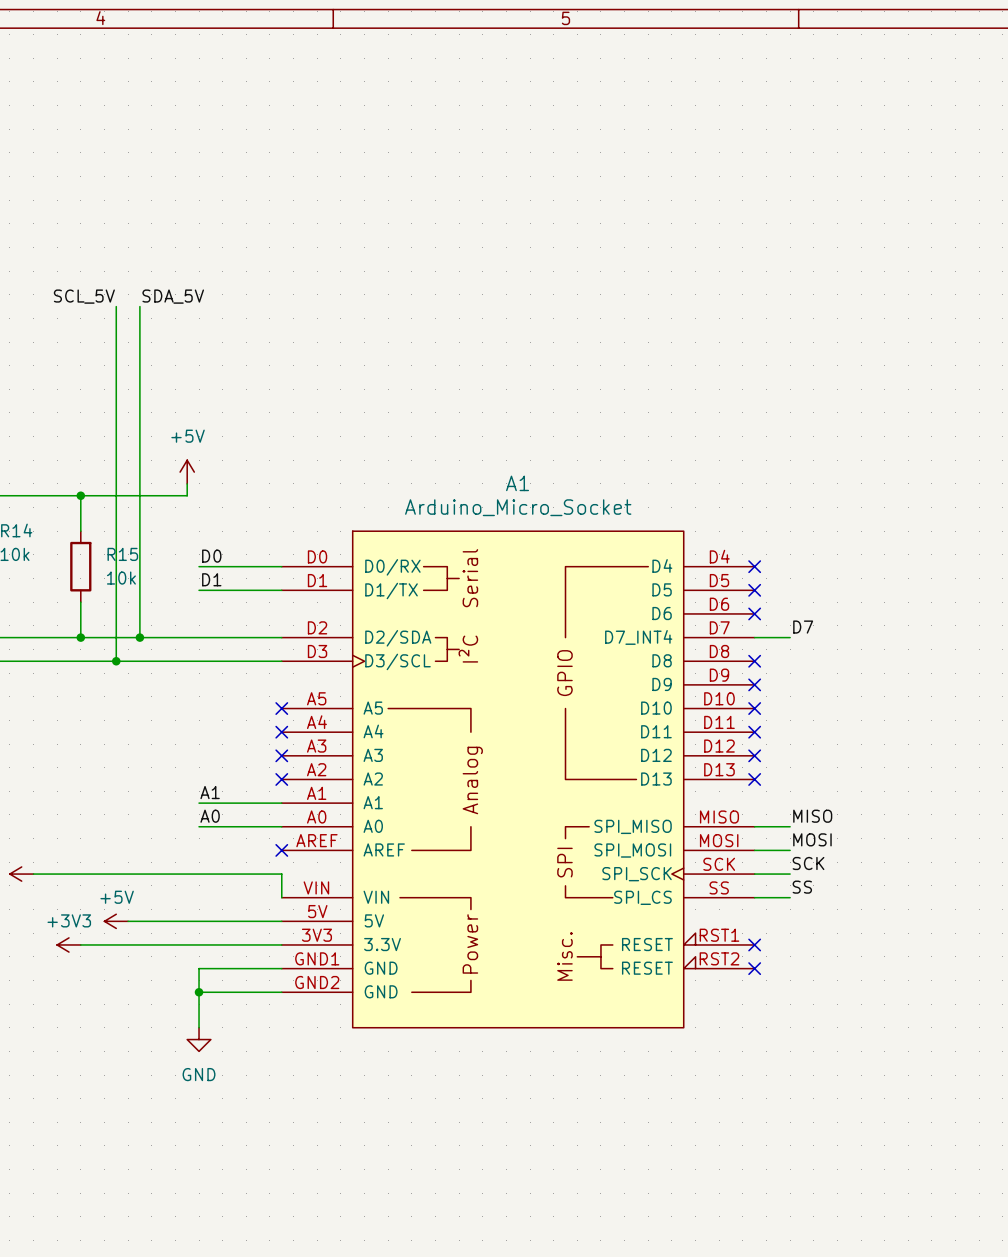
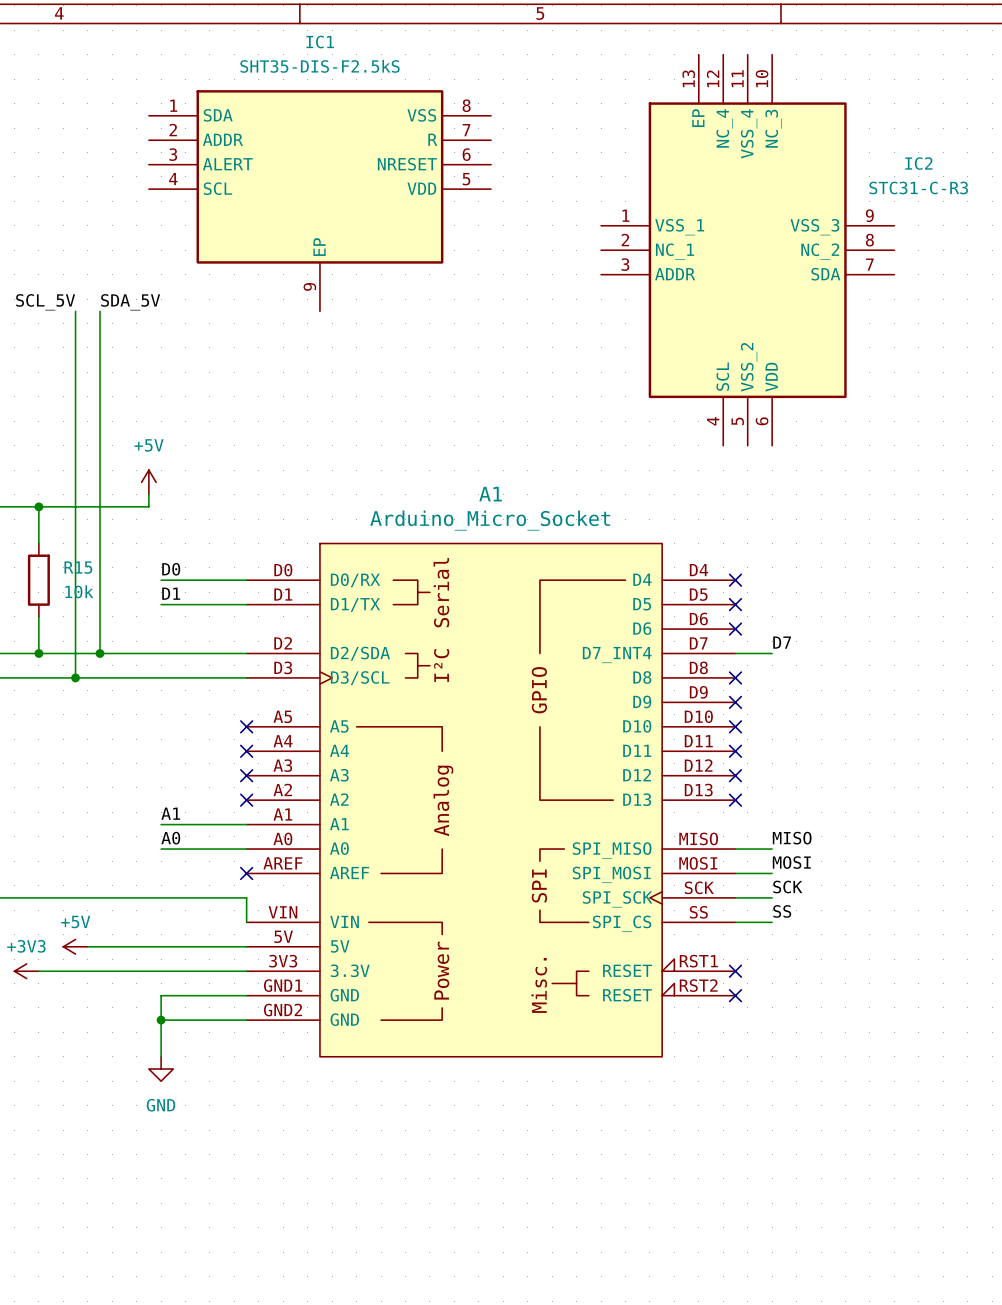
IC1: none -> SHT35-DIS-F2.5kS (319, 200)
IC2: none -> STC31-C-R3 (747, 250)

